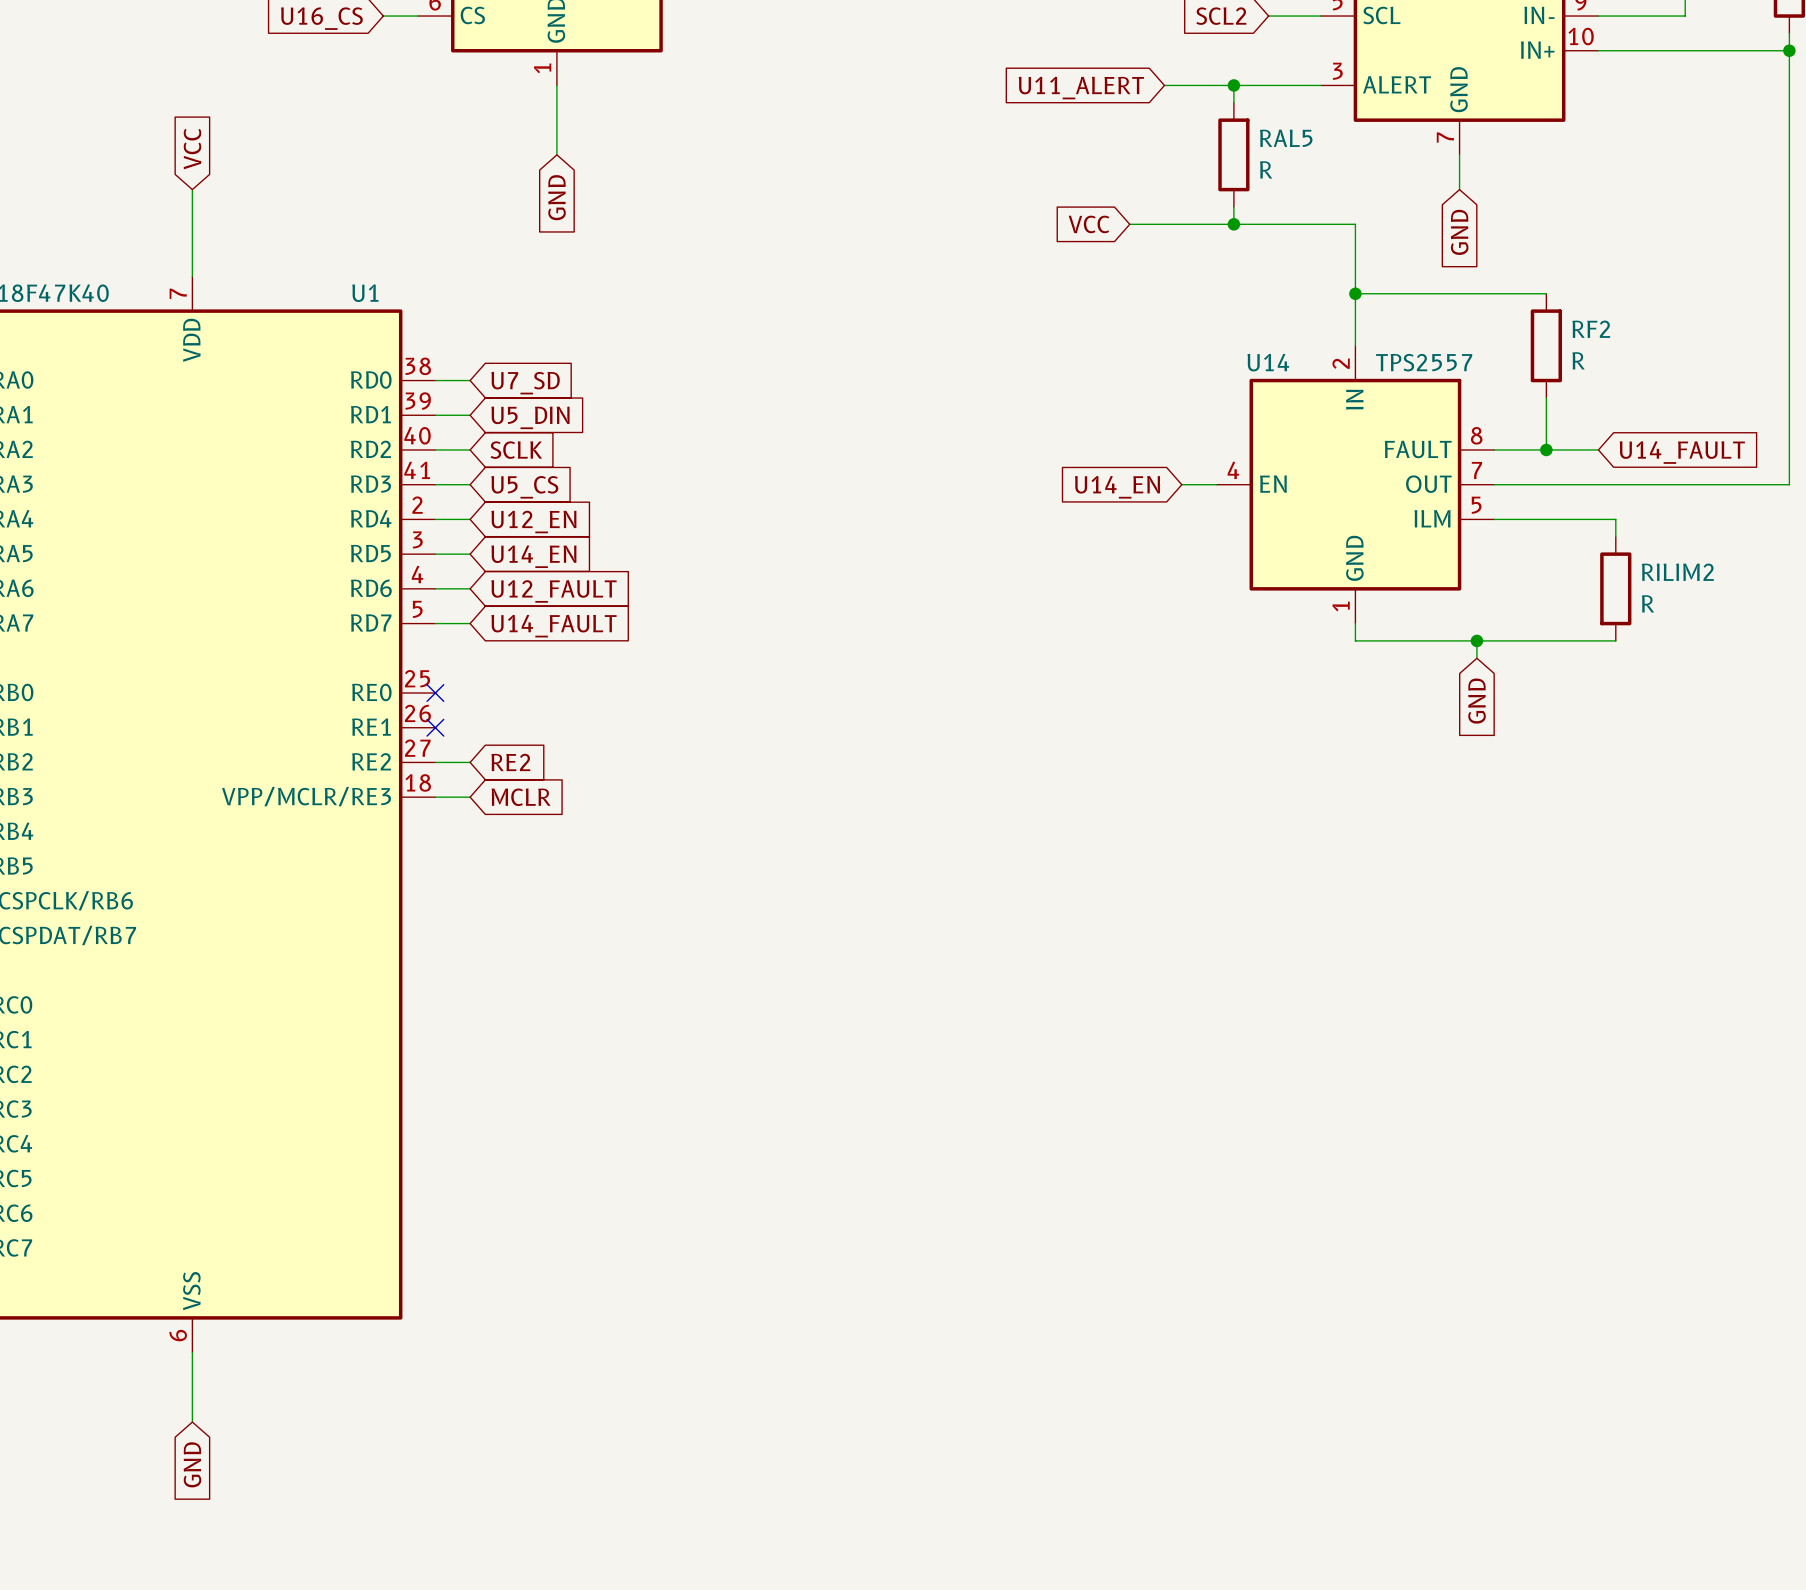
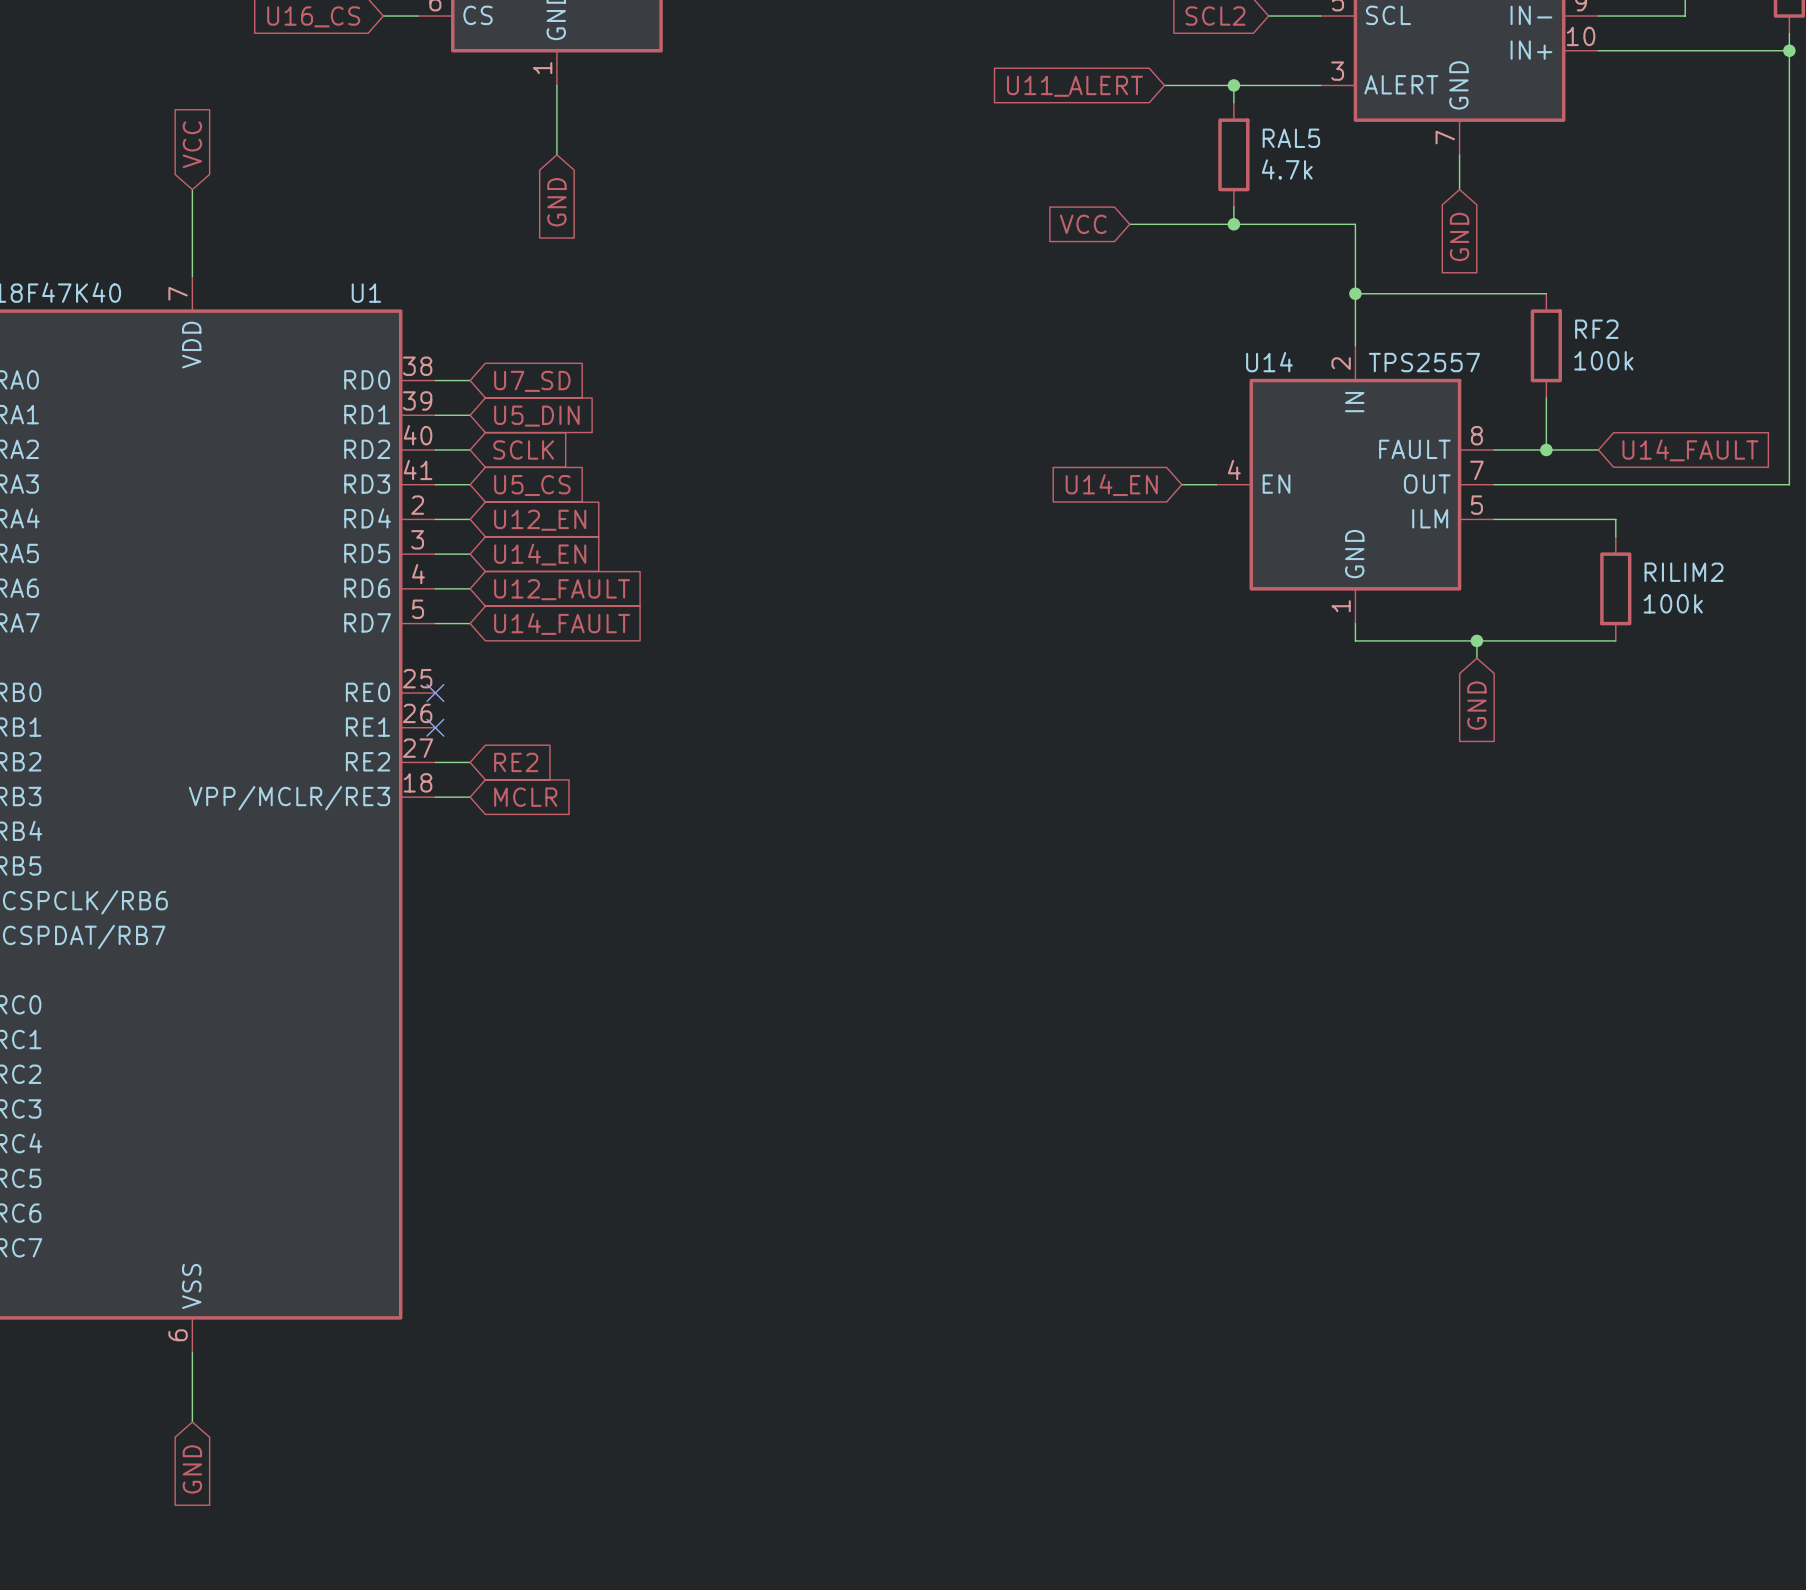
RAL5 value: R (1266, 169) -> 4.7k (1287, 169)
RF2 value: R (1578, 360) -> 100k (1603, 360)
RILIM2 value: R (1648, 603) -> 100k (1673, 603)

